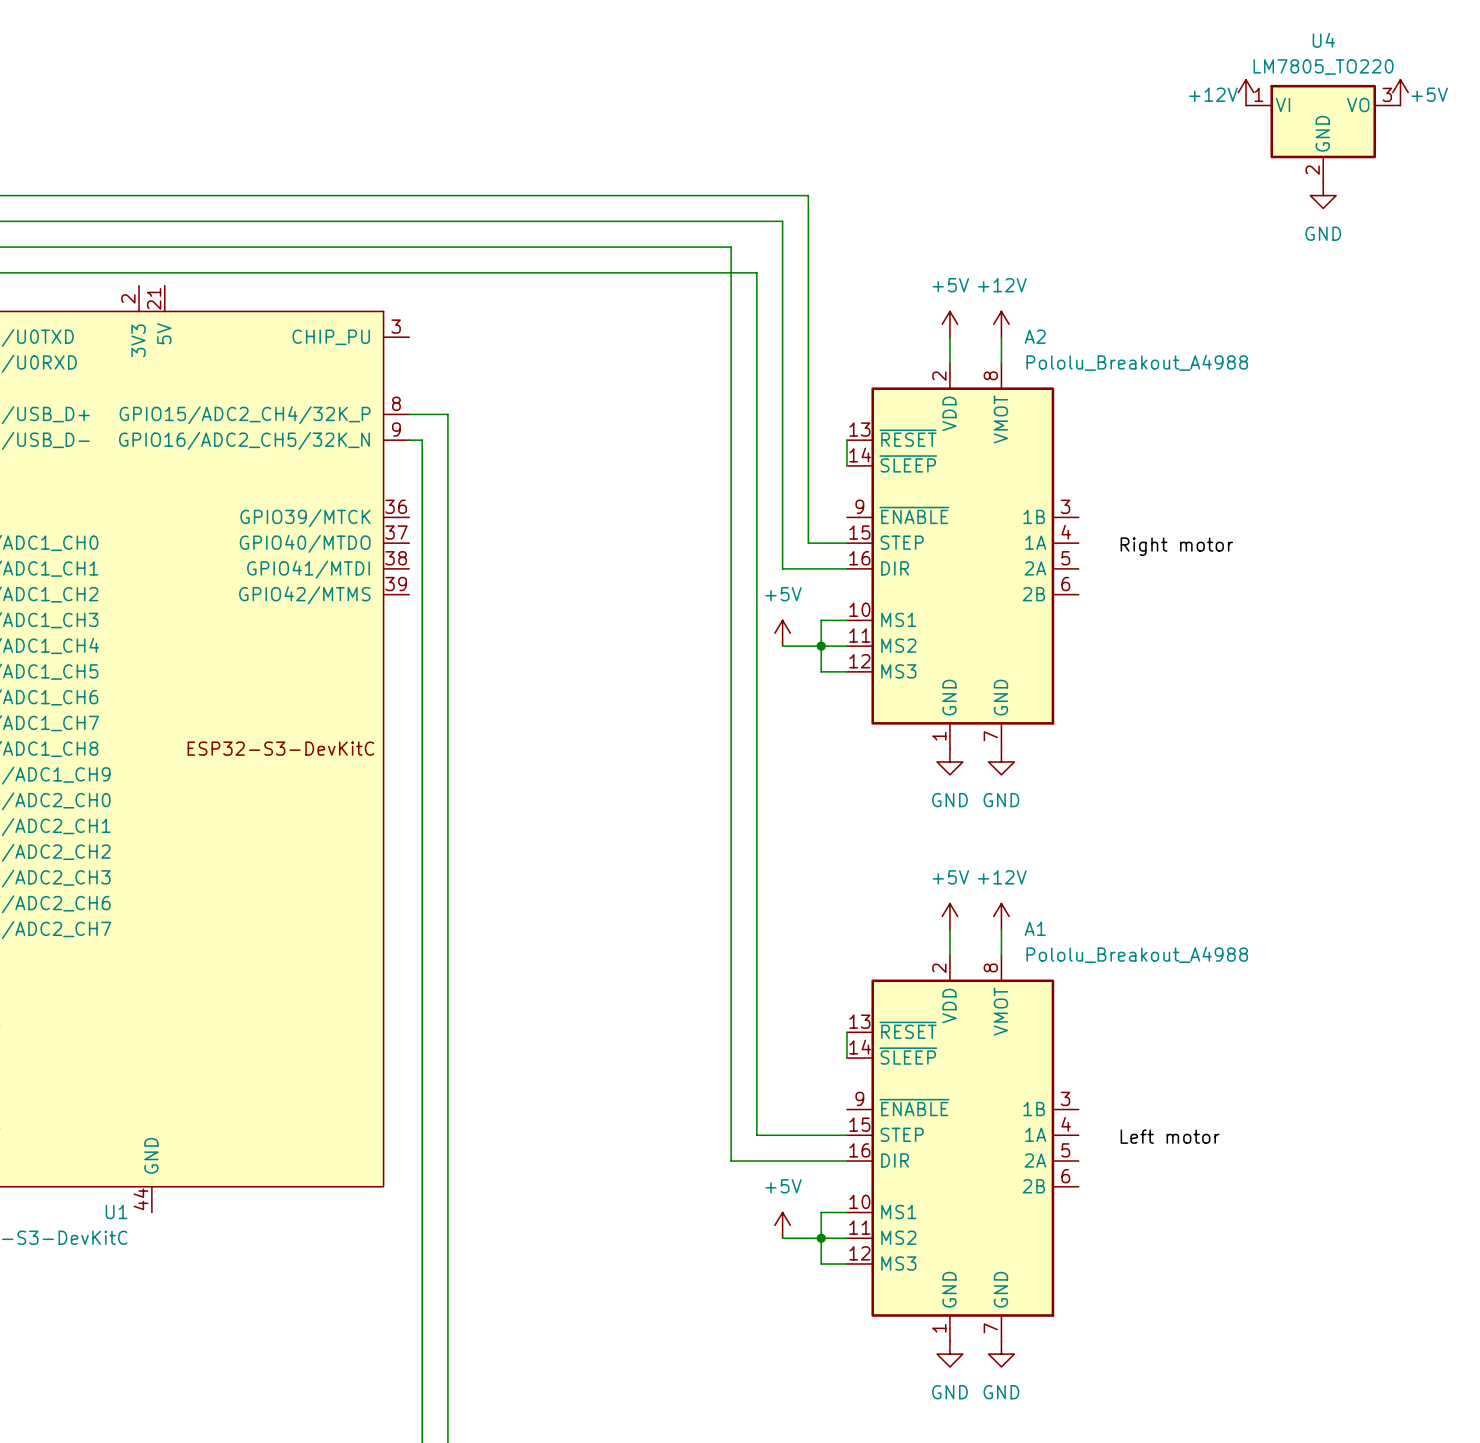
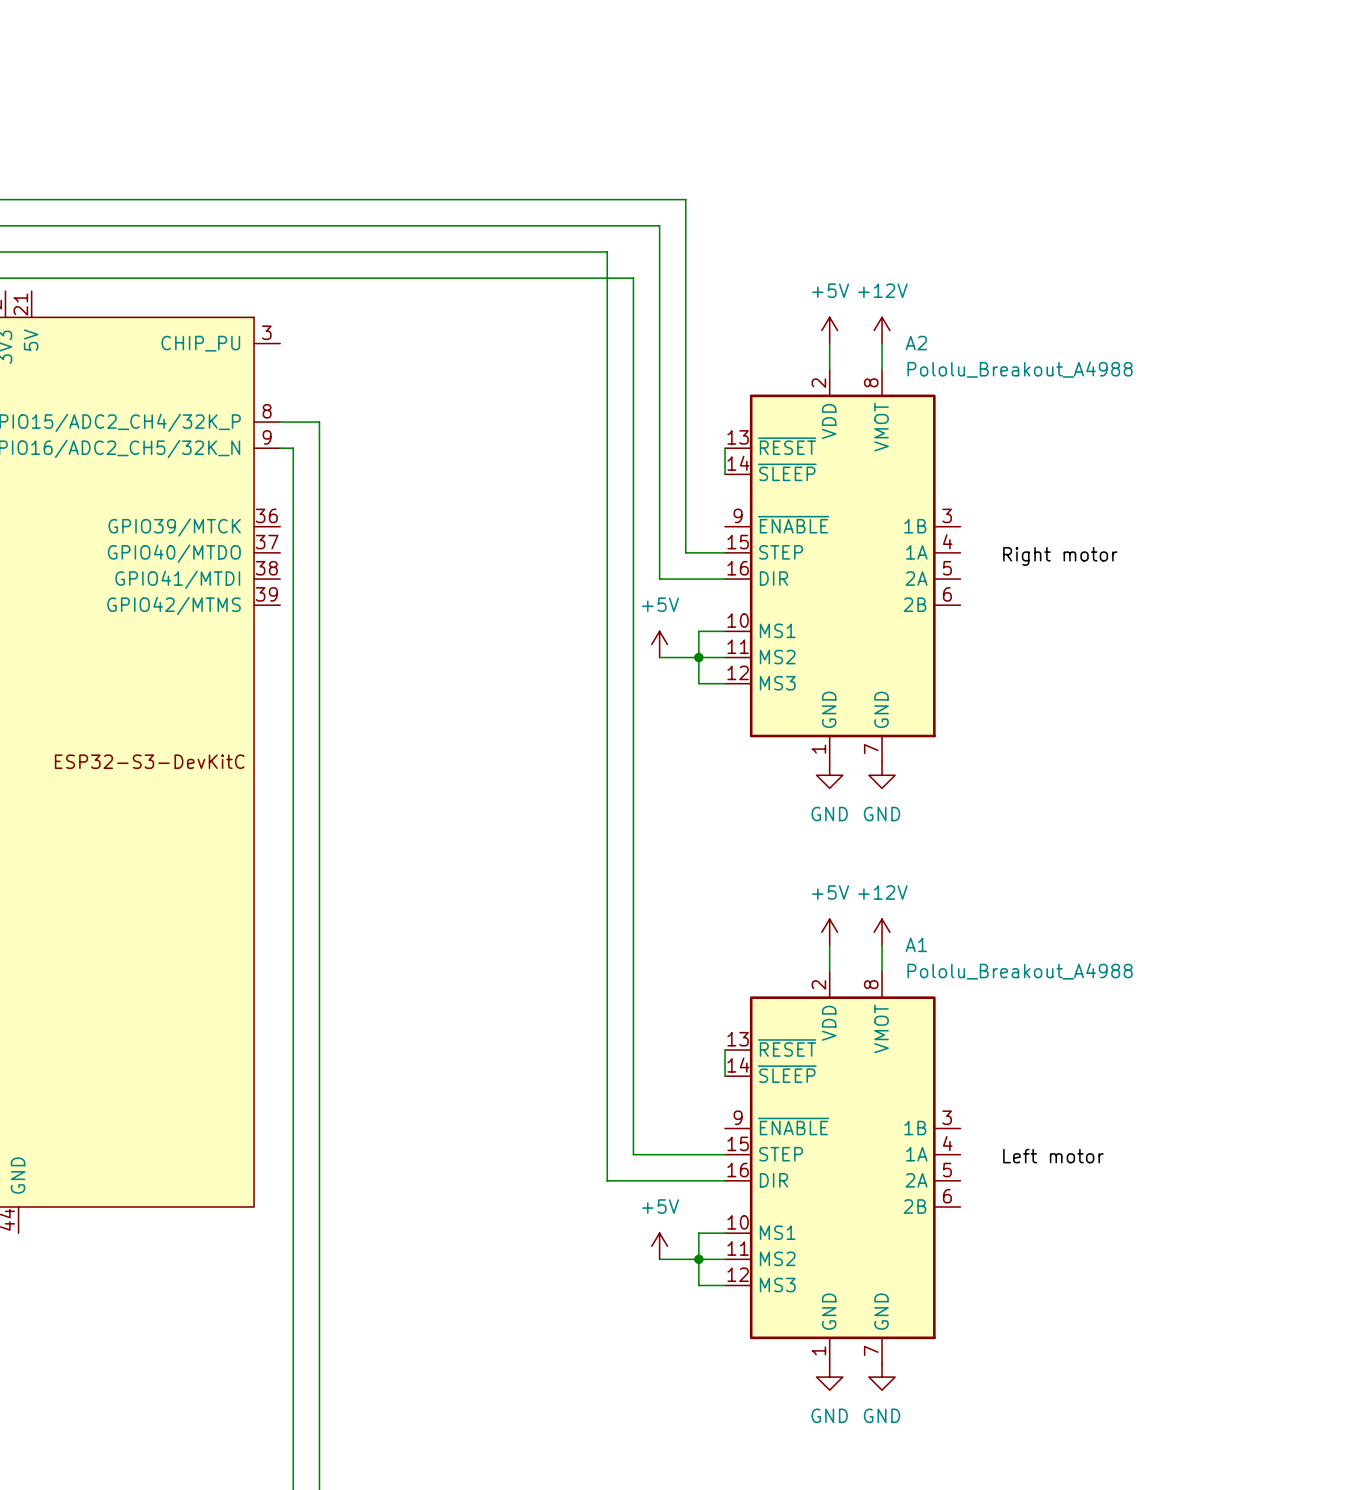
power symbol: +12V (1246, 92) -> none
power symbol: +5V (1400, 92) -> none
U4: LM7805_TO220 (1323, 133) -> none
power symbol: GND (1323, 195) -> none

